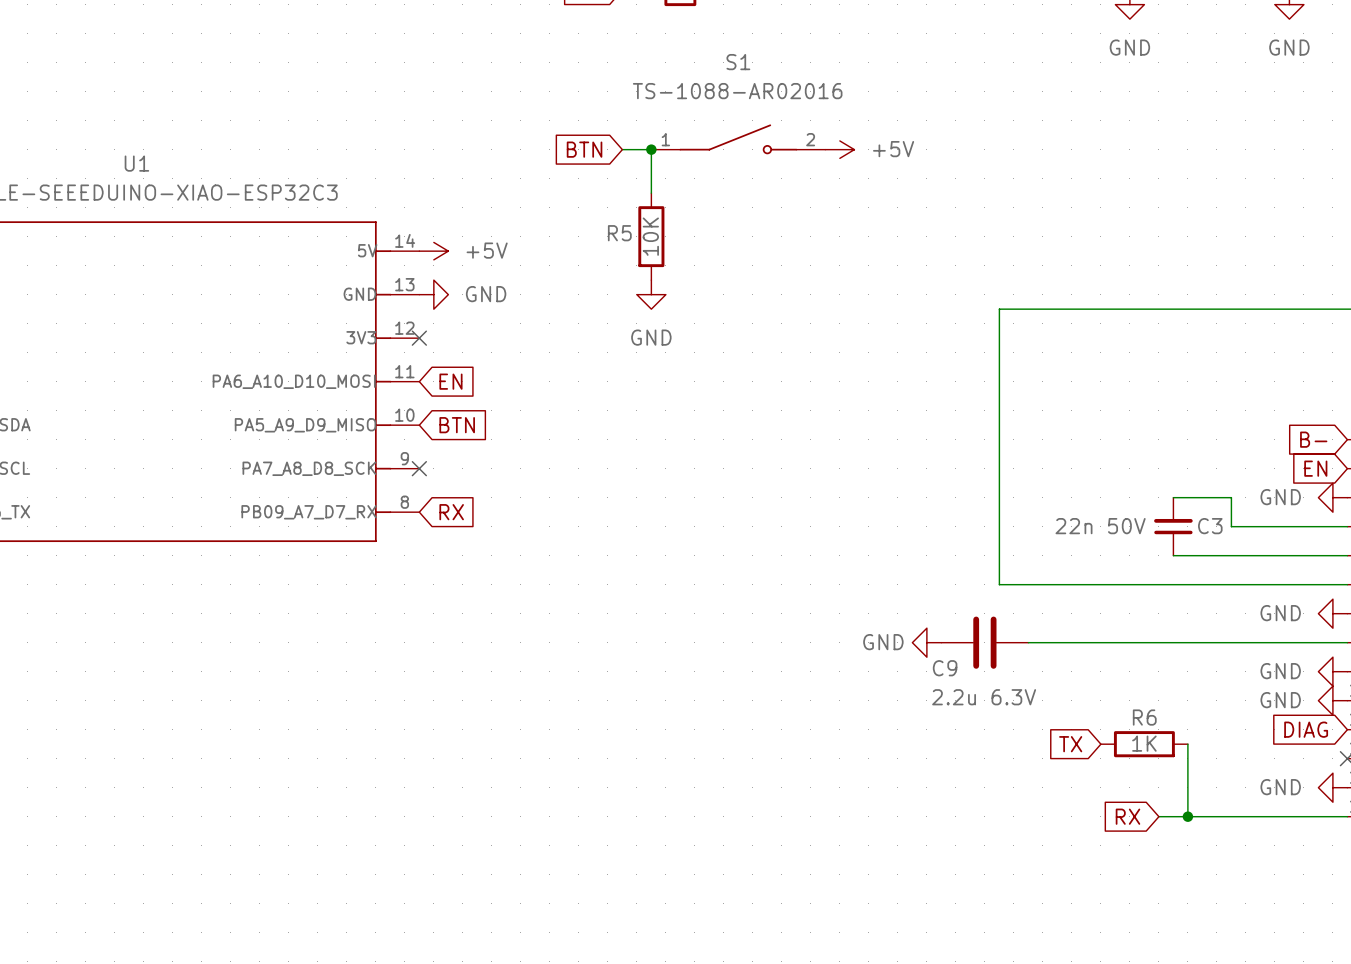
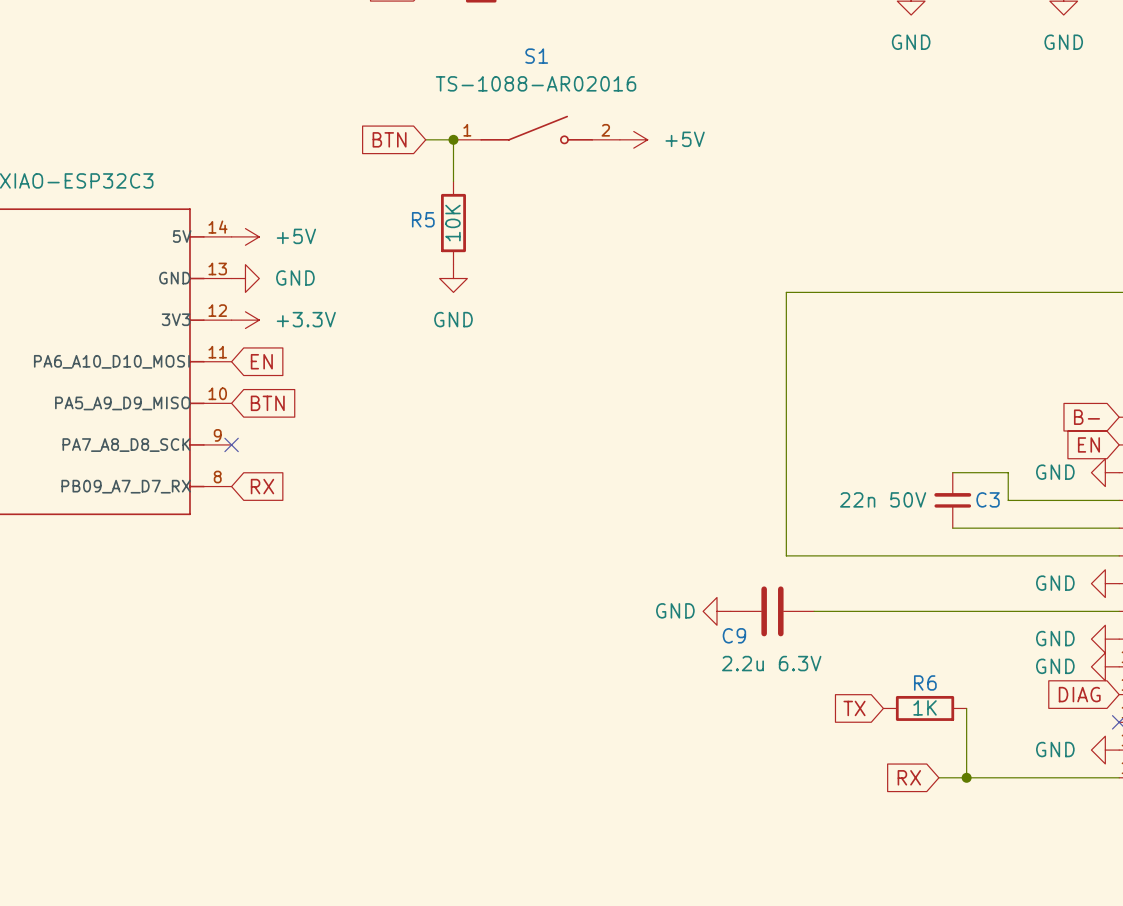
no-connect mark: (419, 338) -> none
power symbol: none -> +3.3V (245, 320)

